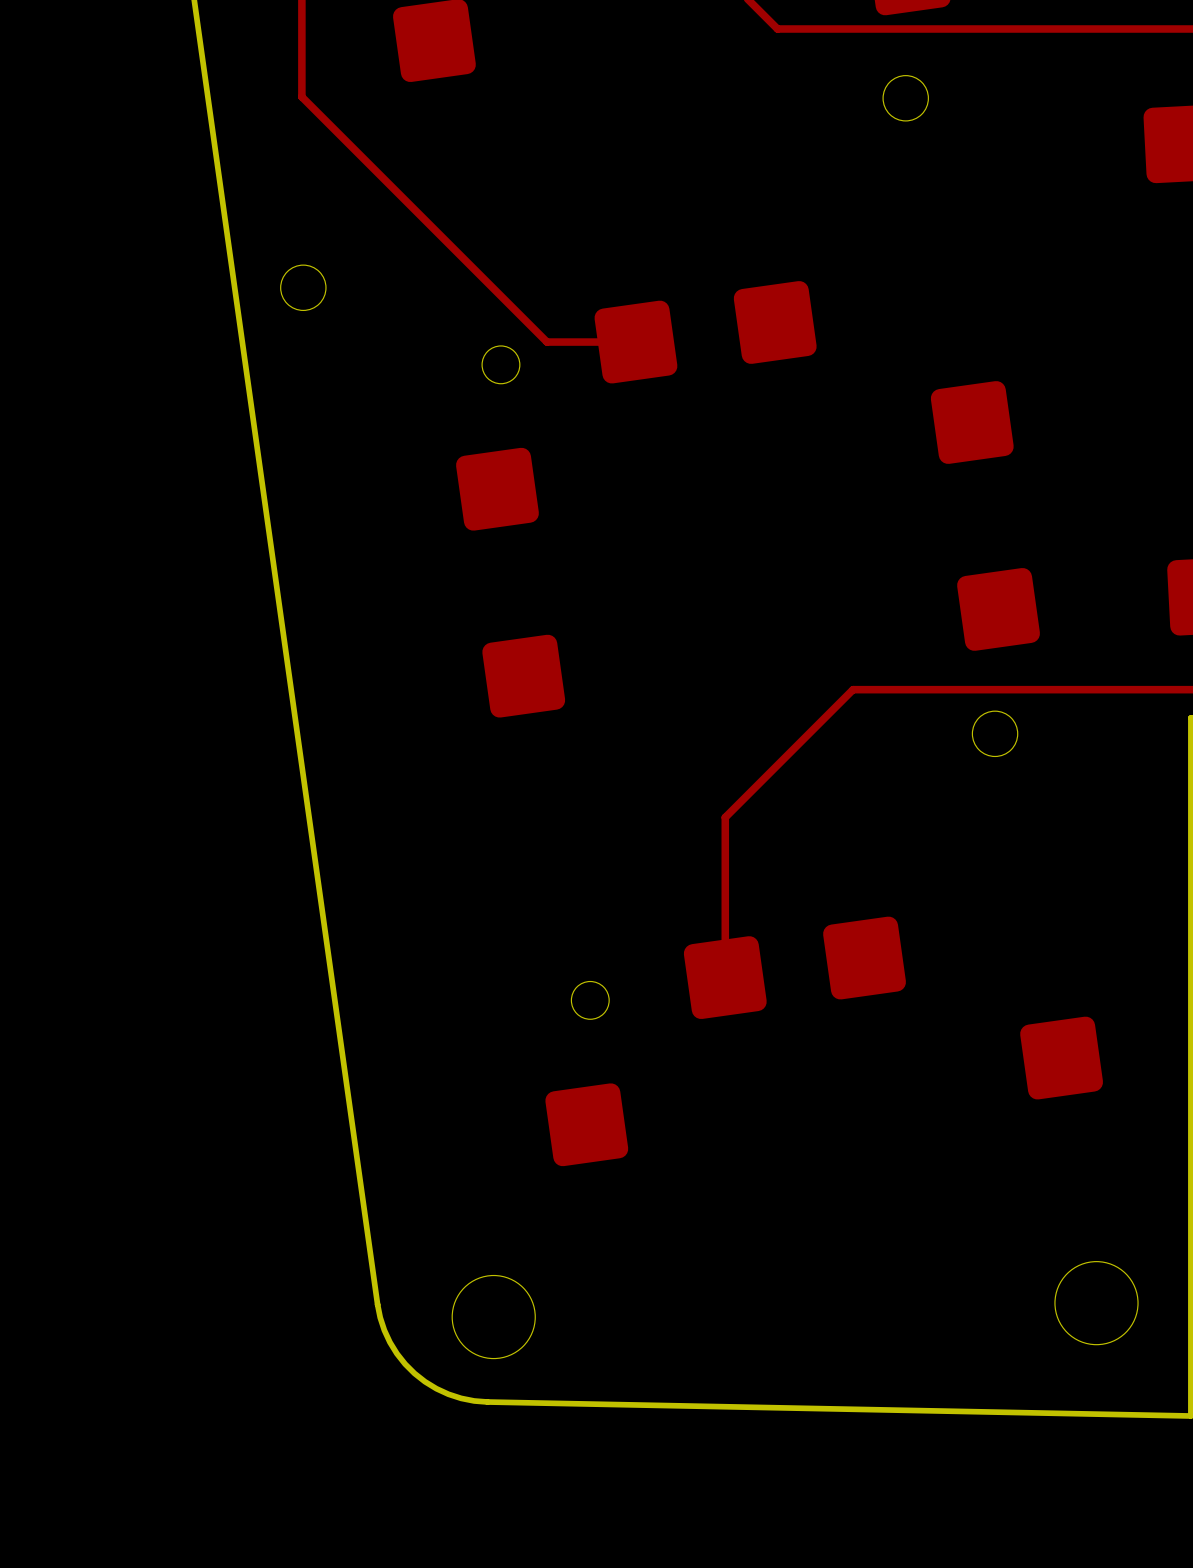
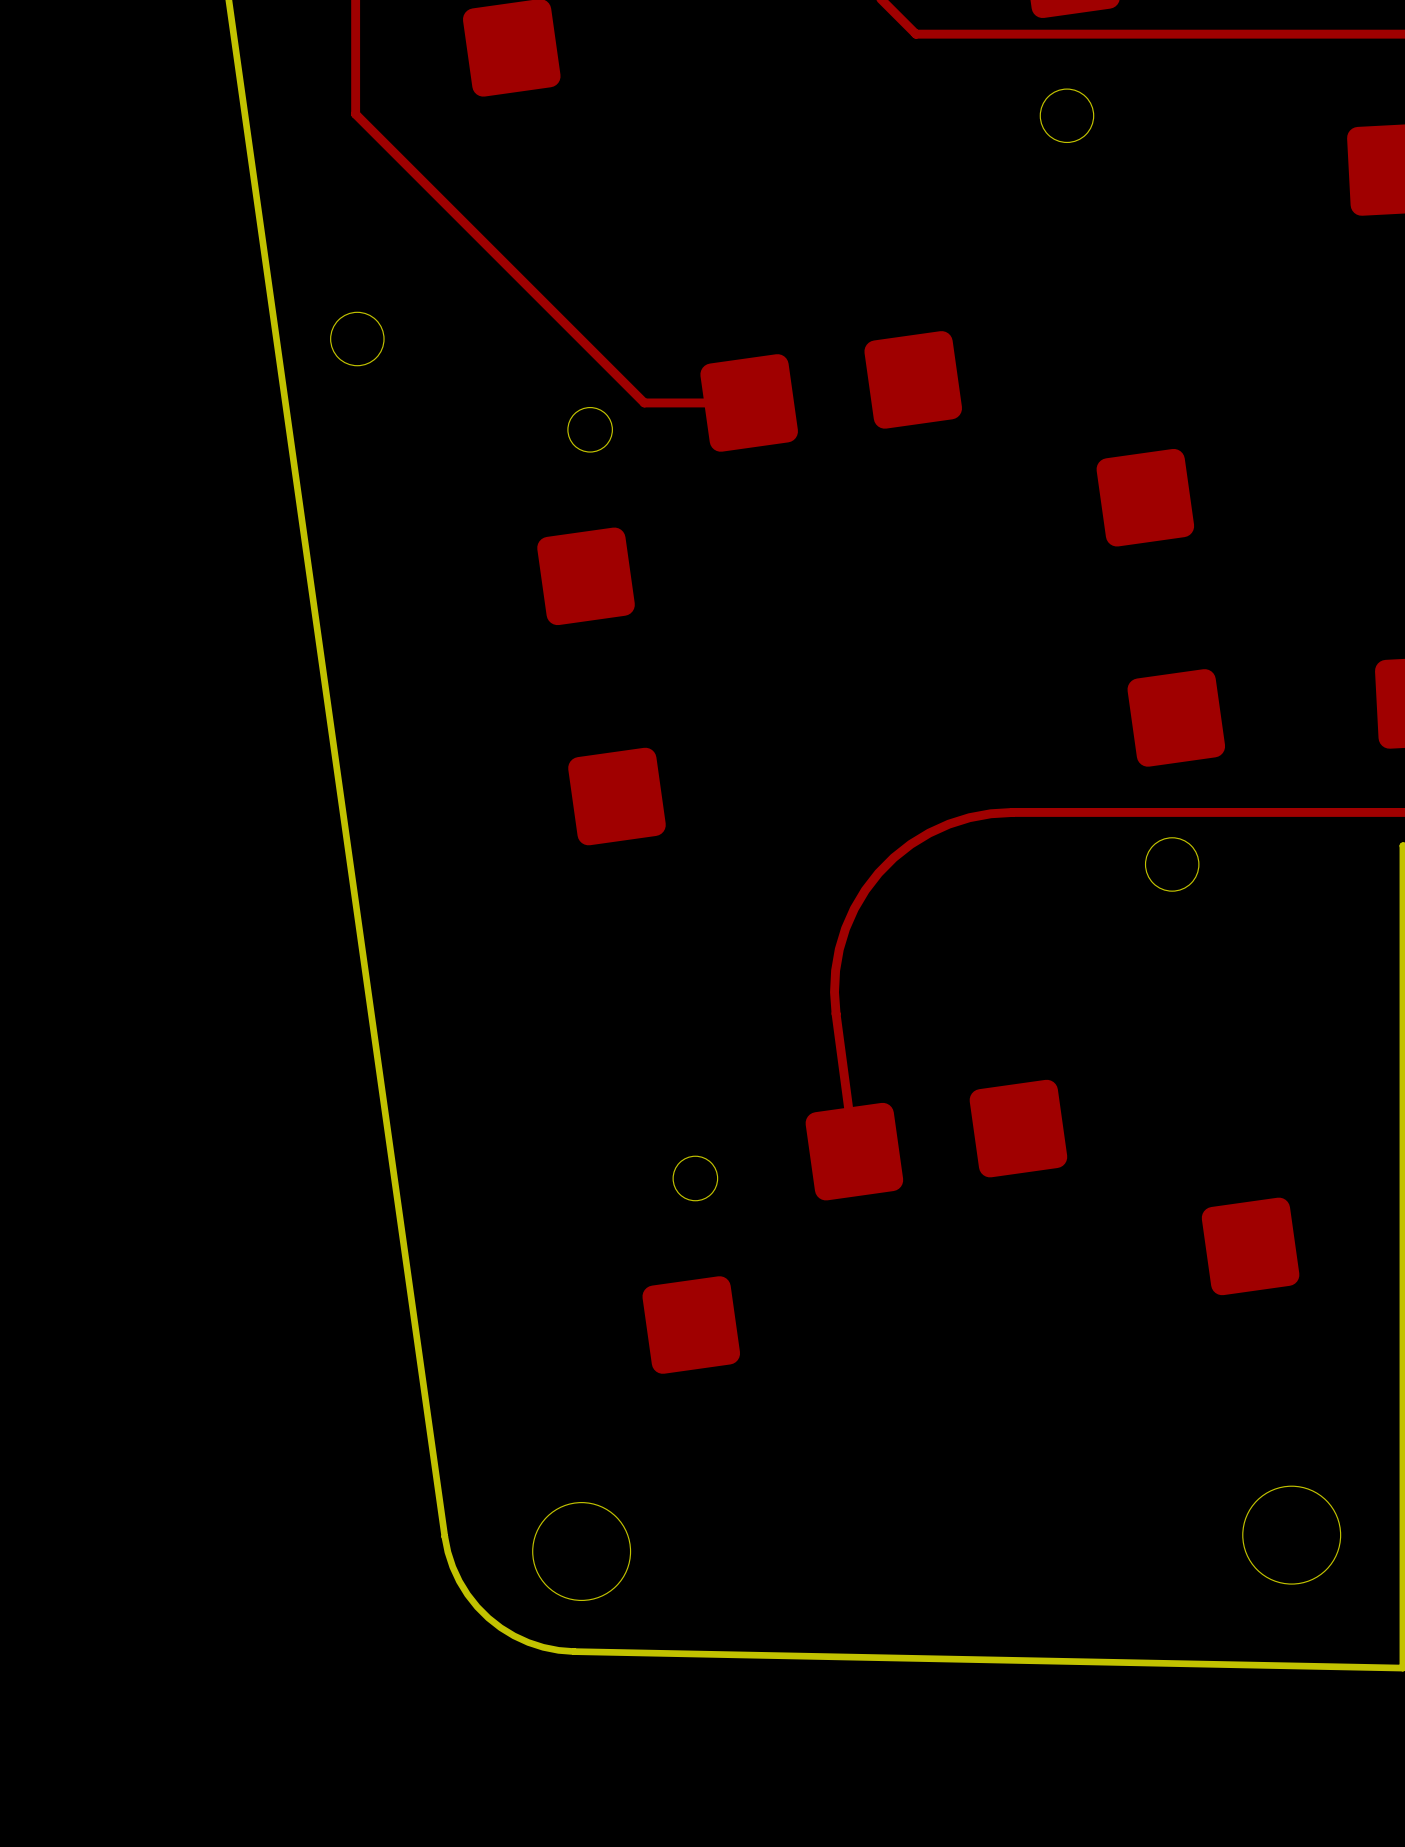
top track: (859, 689) (853, 689) (725, 817) (725, 977) -> (1012, 812) (969, 817) (948, 824) (910, 844) (878, 873) (854, 908) (839, 949) (834, 992) (854, 1151)

